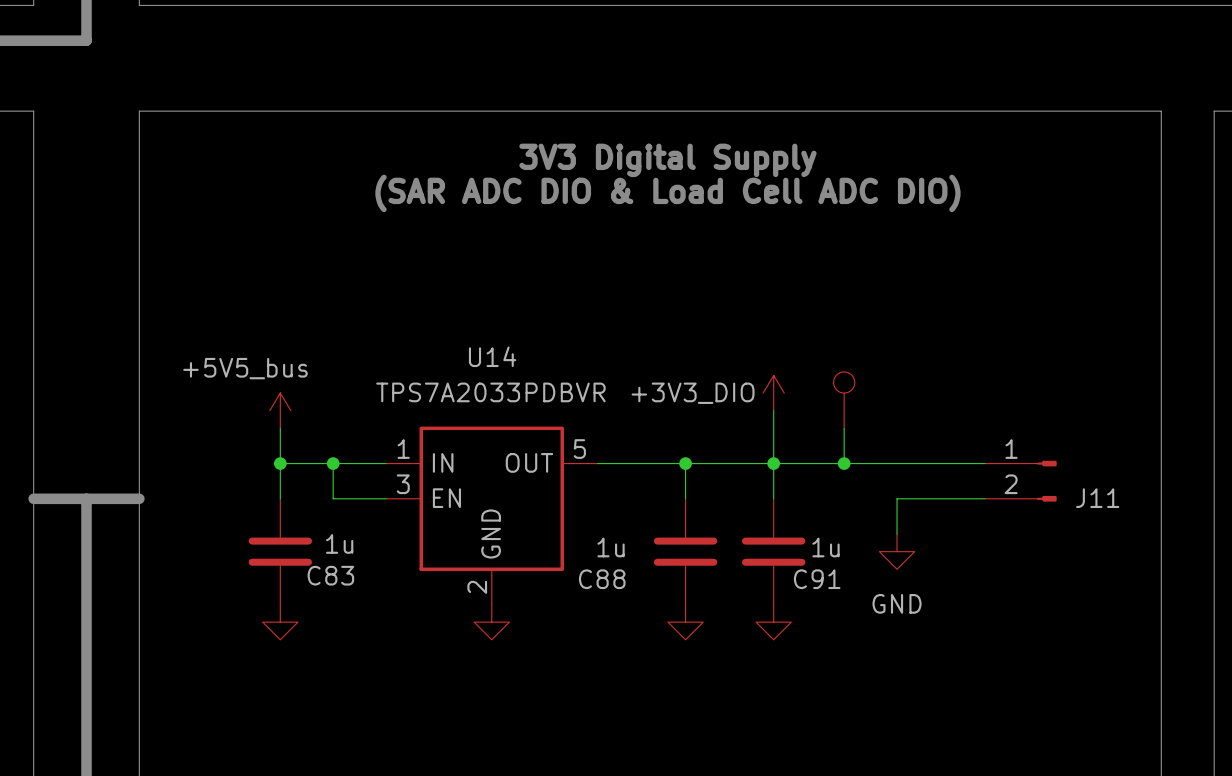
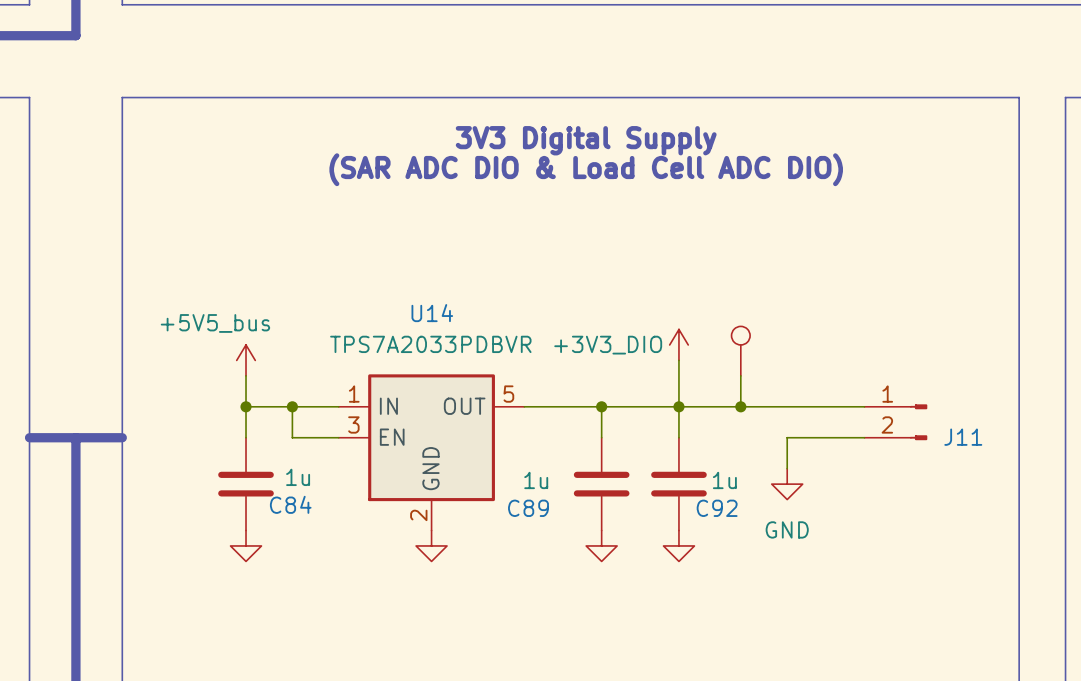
C83 name: C83 (330, 575) -> C84 (290, 504)
C88 name: C88 (602, 579) -> C89 (528, 508)
C91 name: C91 (817, 579) -> C92 (717, 508)

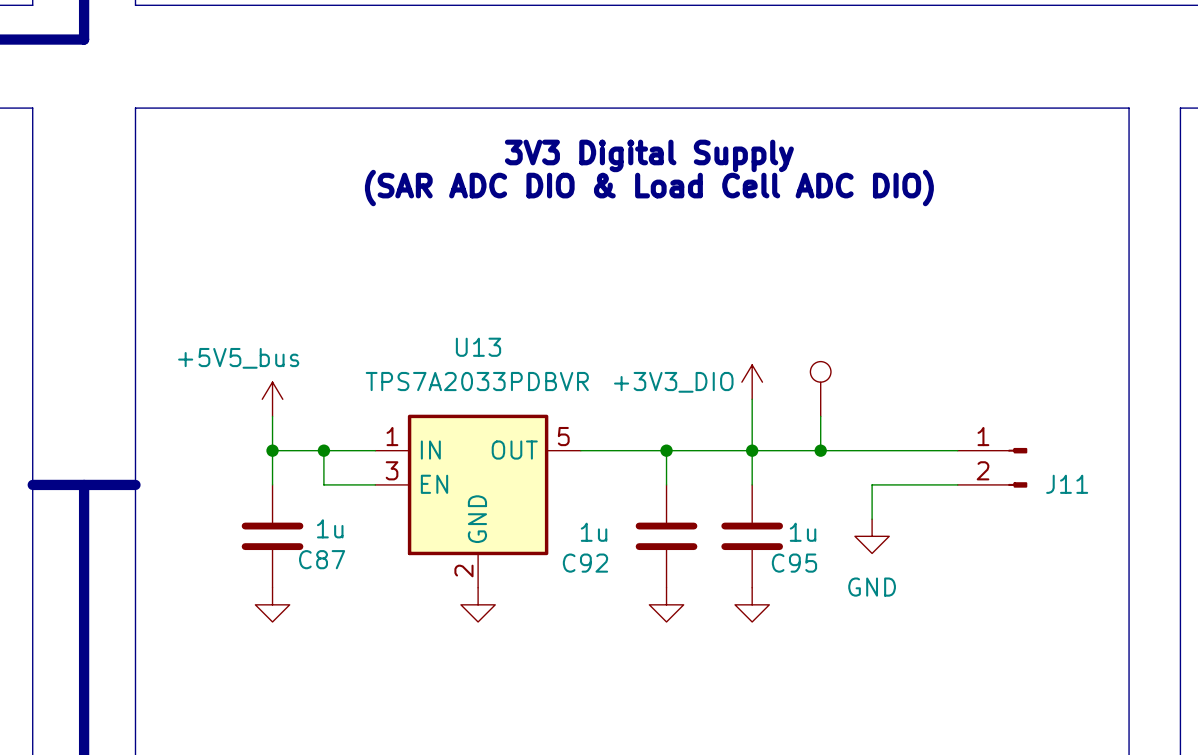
U14 name: U14 (432, 313) -> U13 (478, 347)
C84 name: C84 (290, 504) -> C87 (322, 559)
C89 name: C89 (528, 508) -> C92 (585, 563)
C92 name: C92 (717, 508) -> C95 (794, 563)

